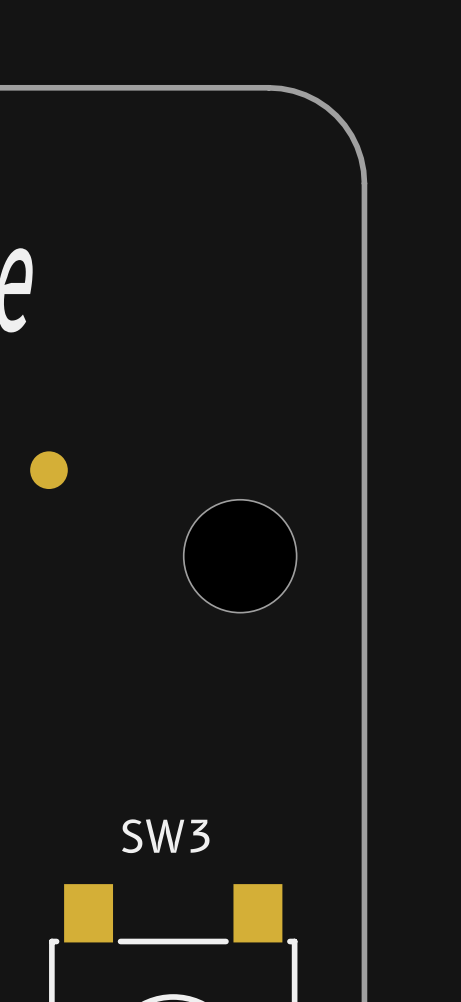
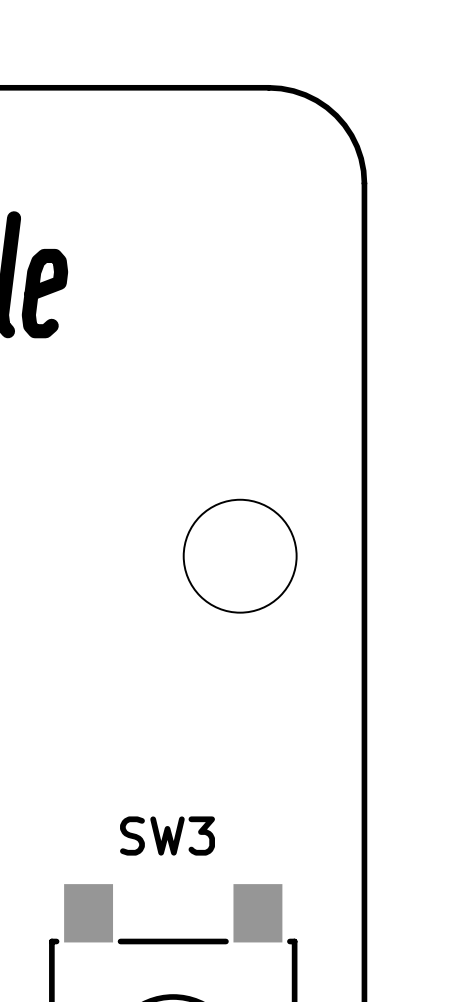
part: (48, 470) -> none

